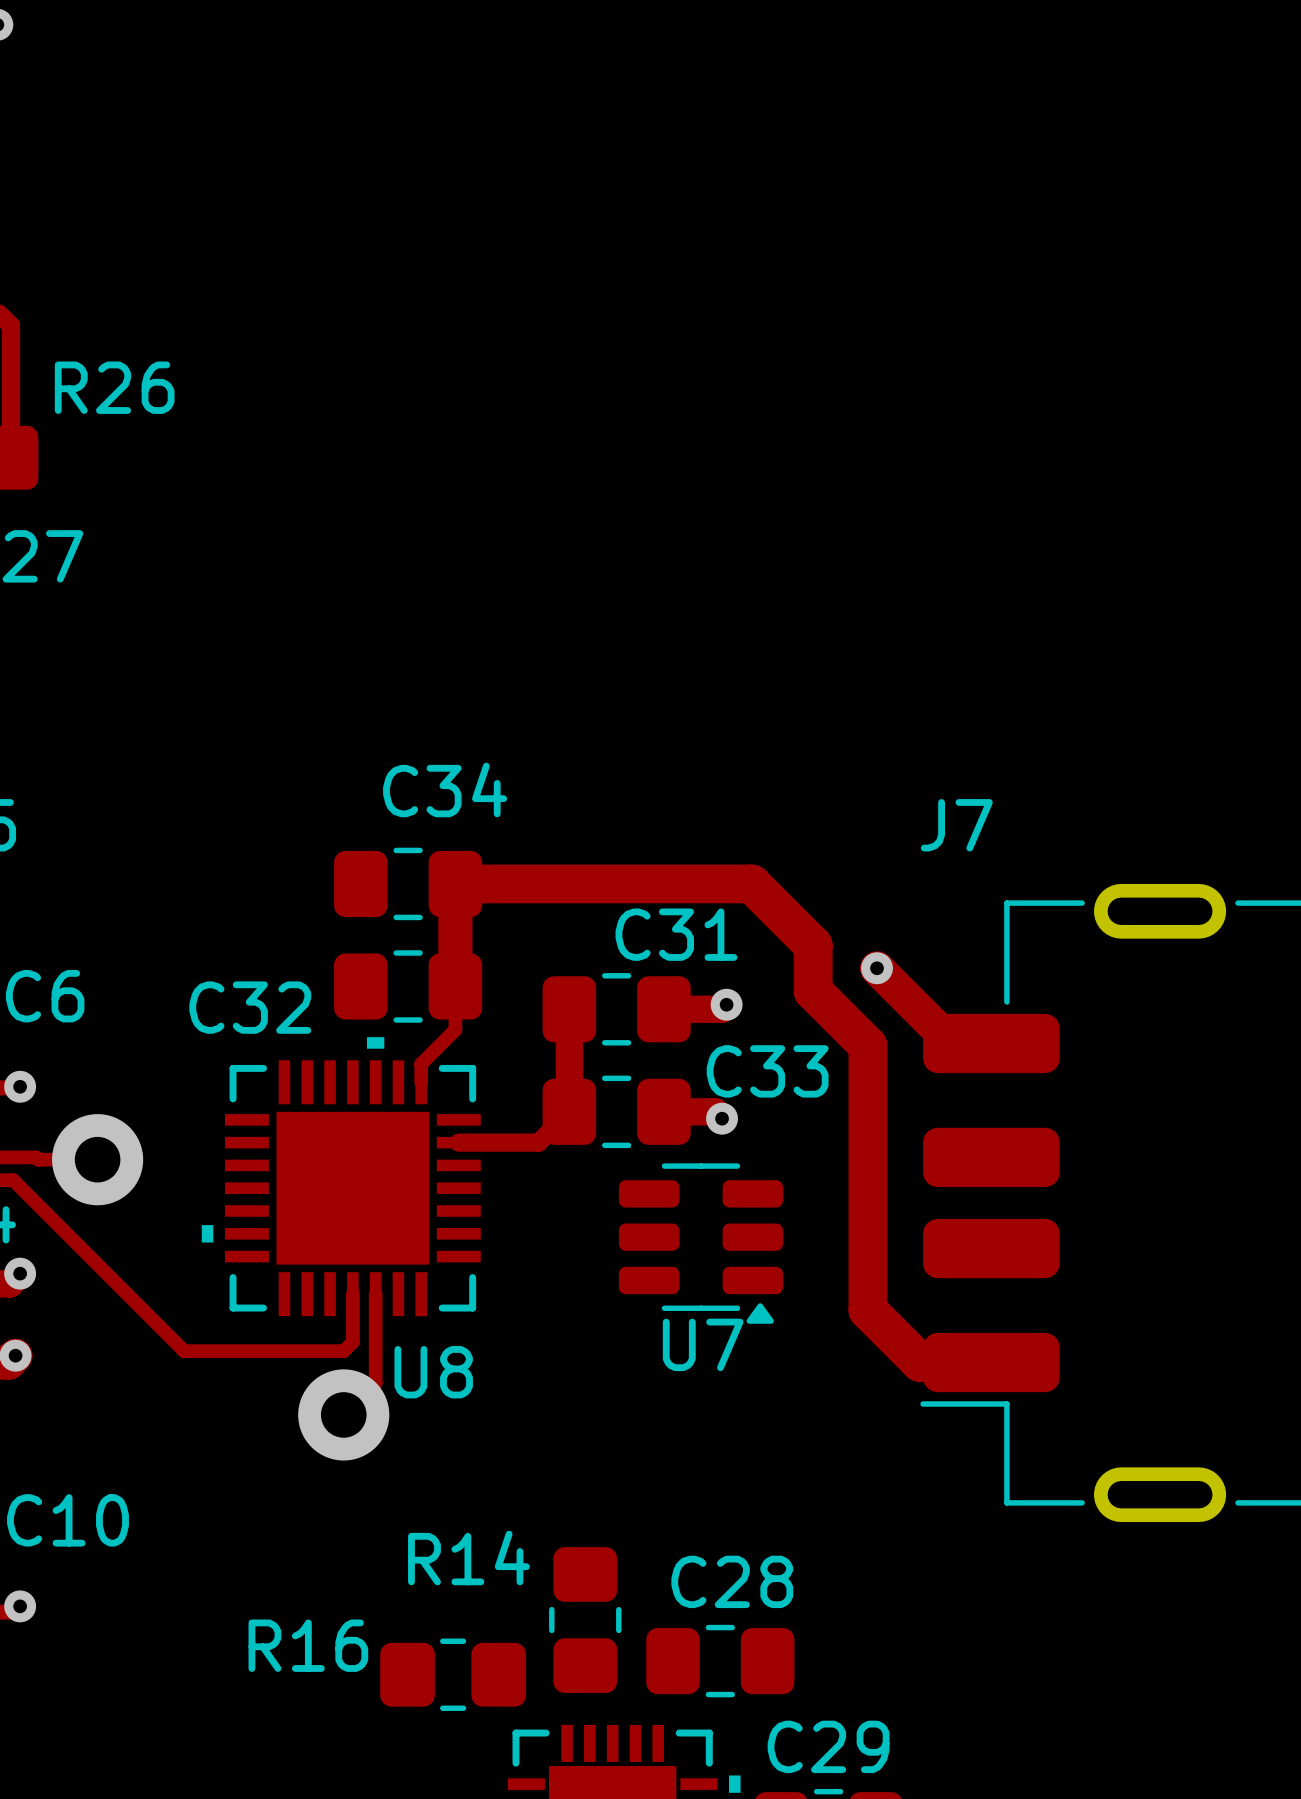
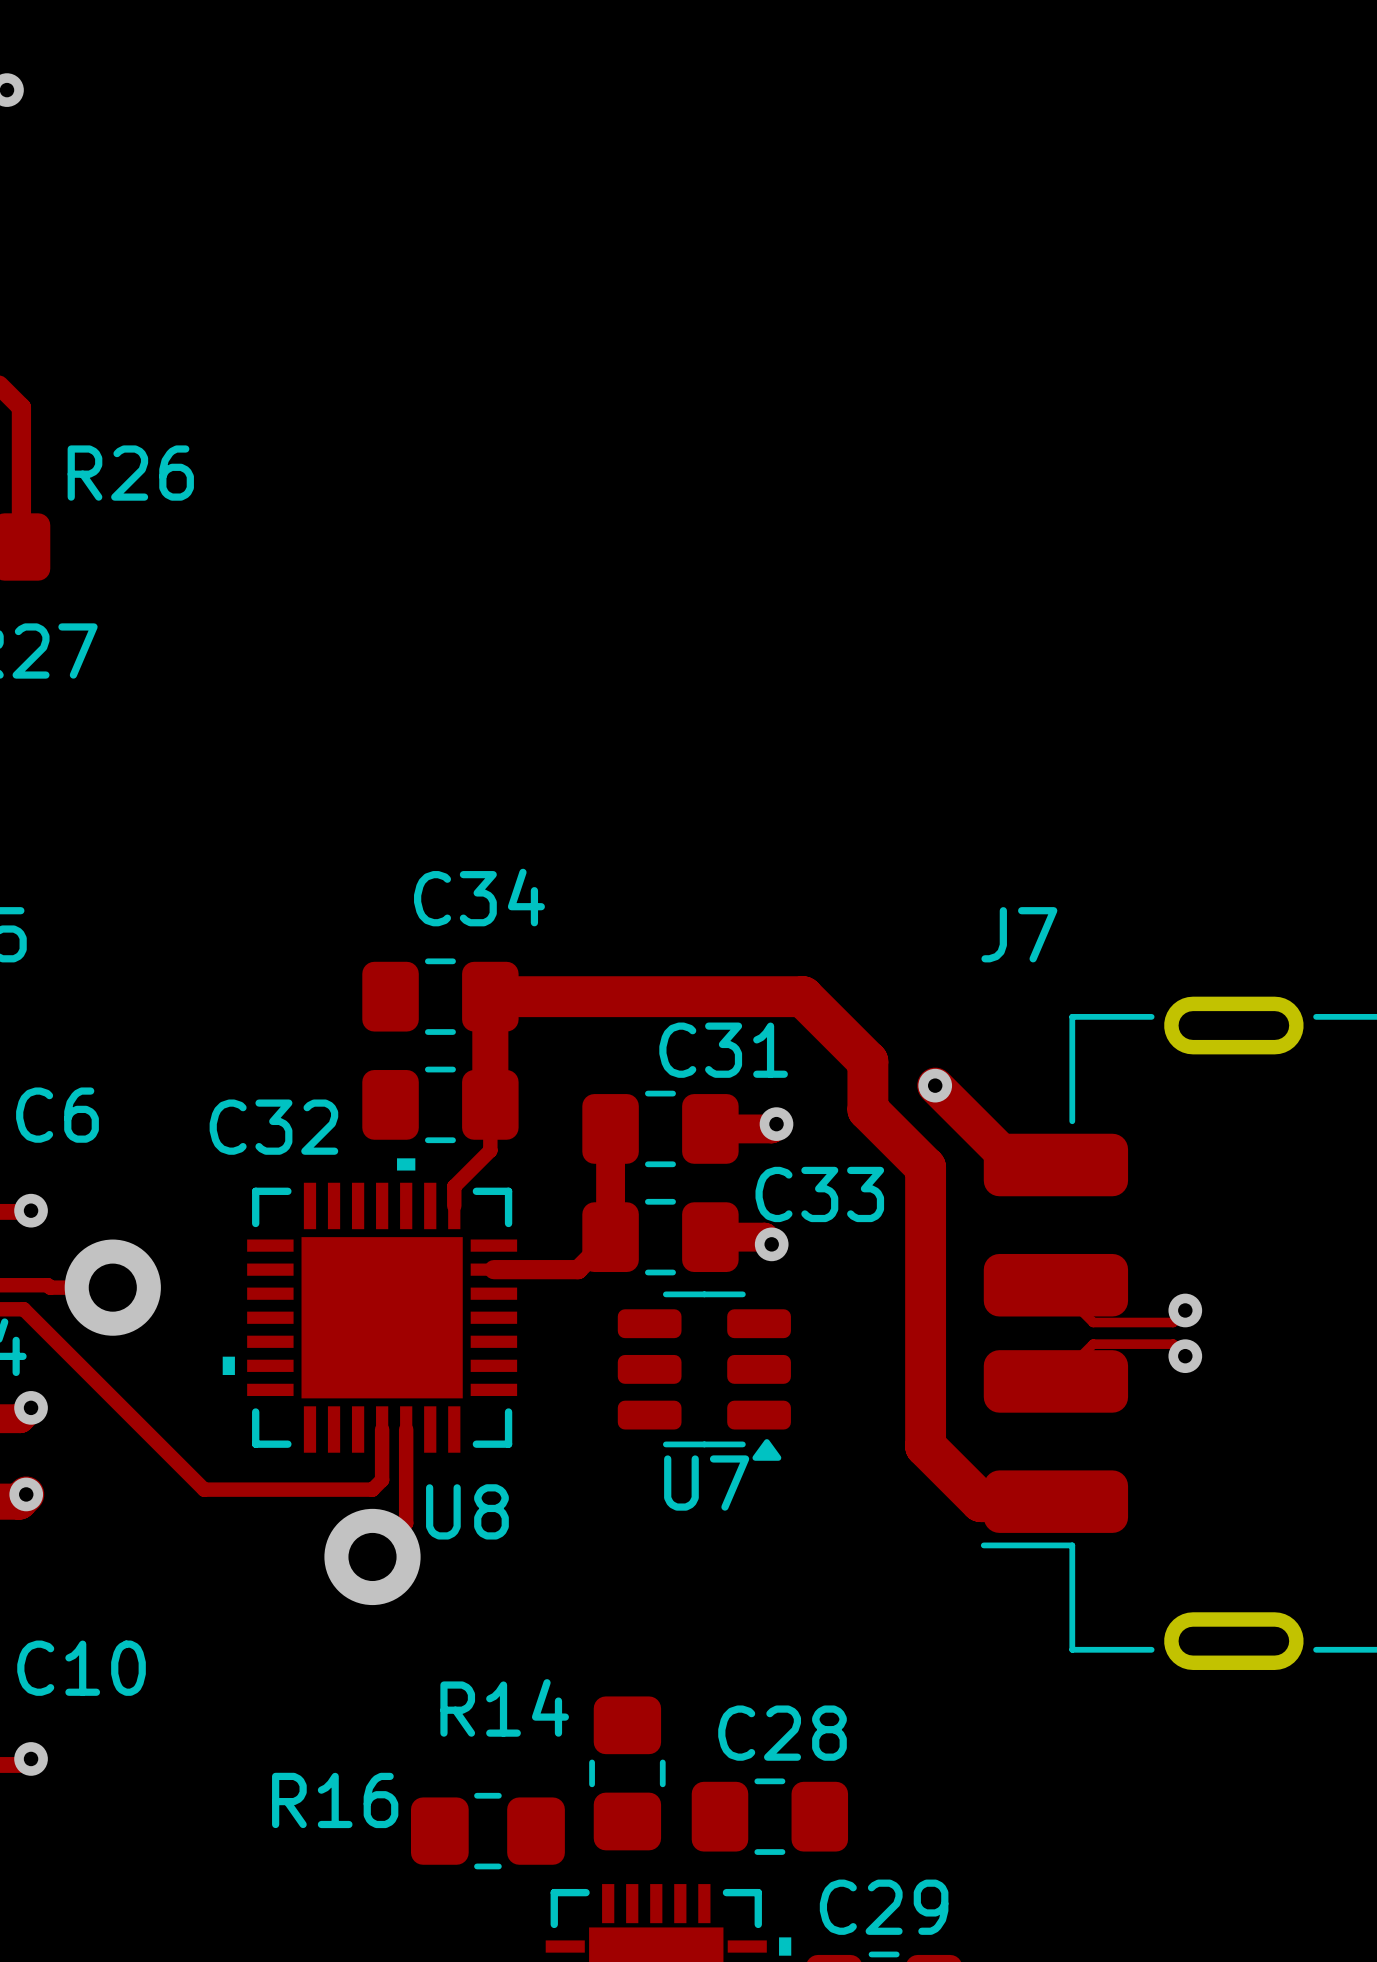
track: none -> (1055, 1285) (1093, 1322) (1173, 1322) (1185, 1310)
via: none -> (1185, 1310)
track: none -> (1185, 1356) (1173, 1344) (1093, 1344) (1055, 1381)
via: none -> (1185, 1356)
U7 position: (700, 1243) -> (704, 1376)

